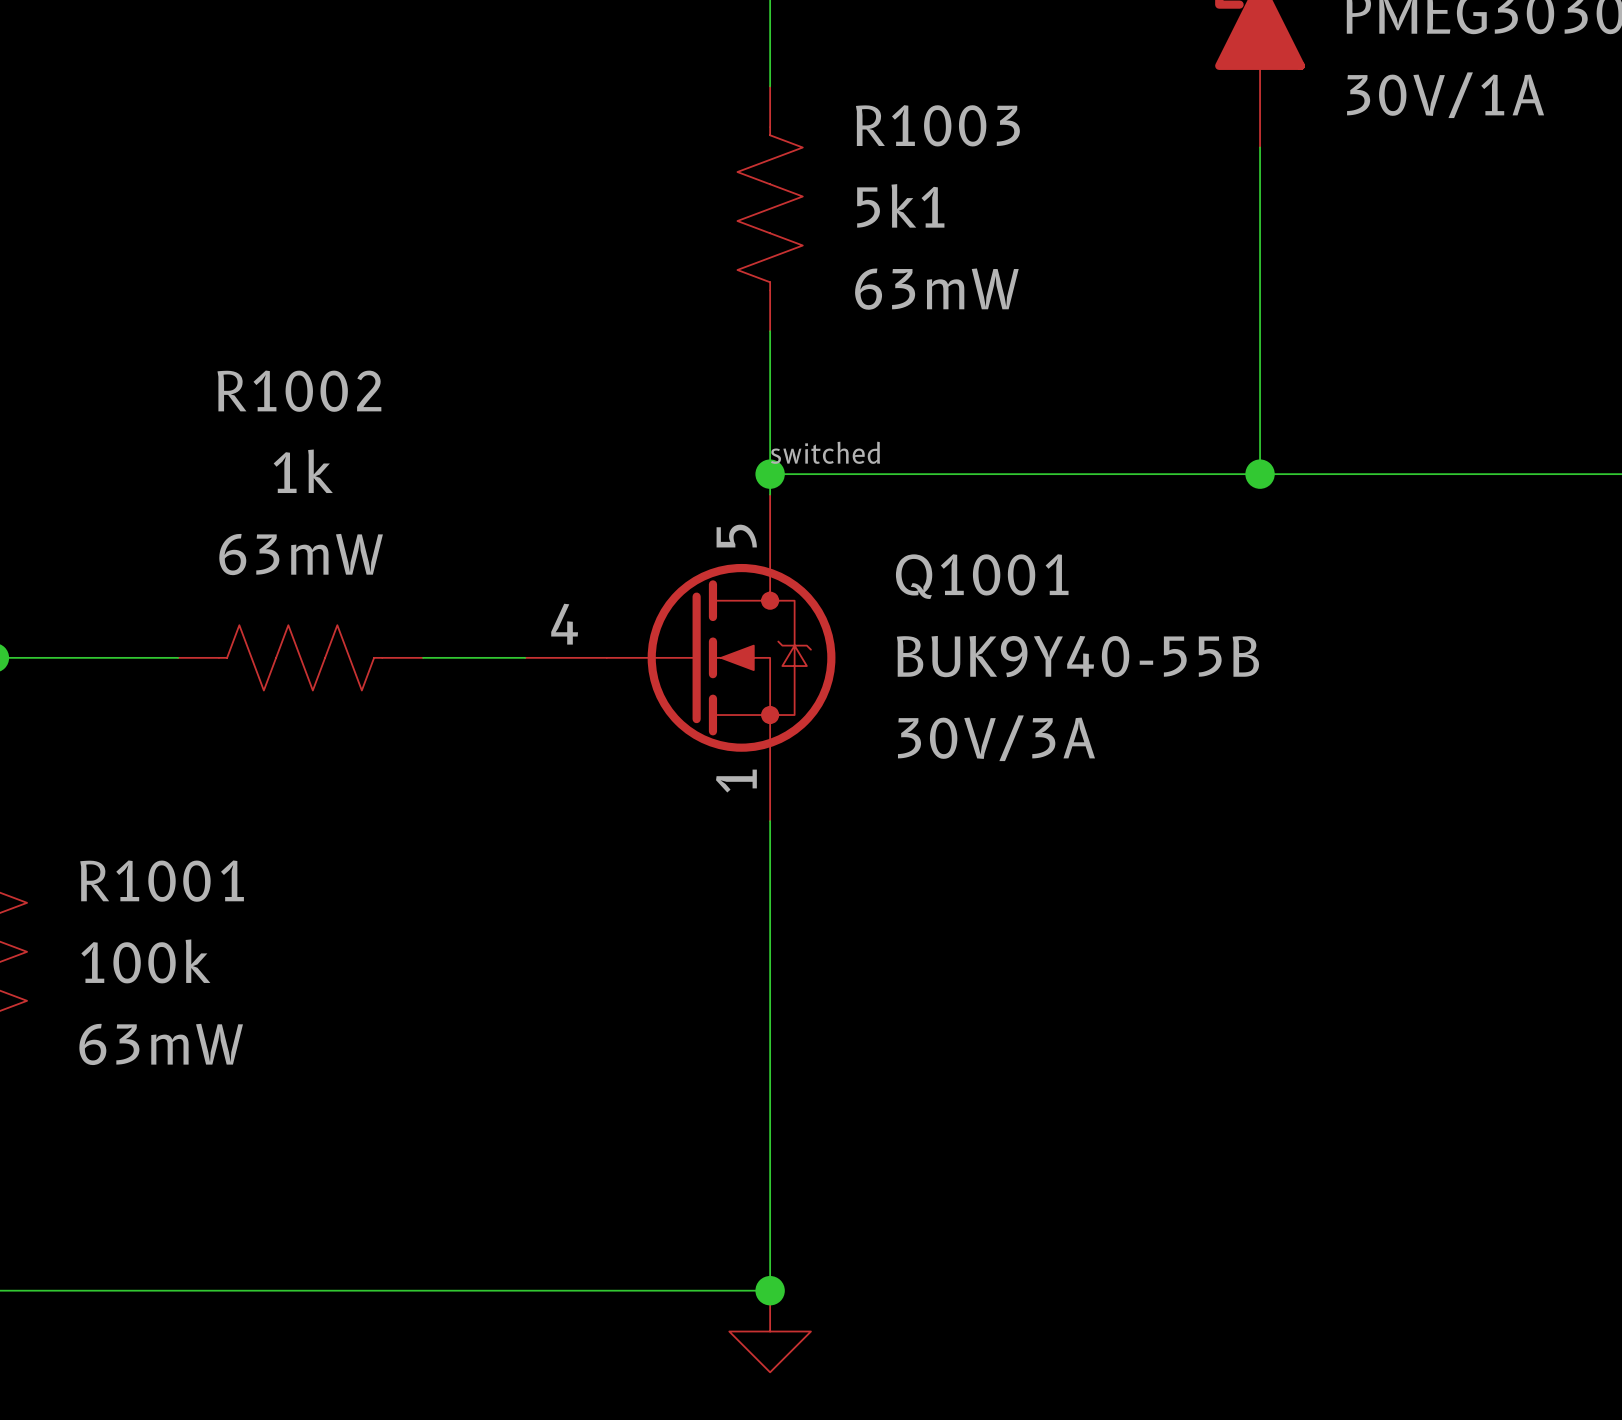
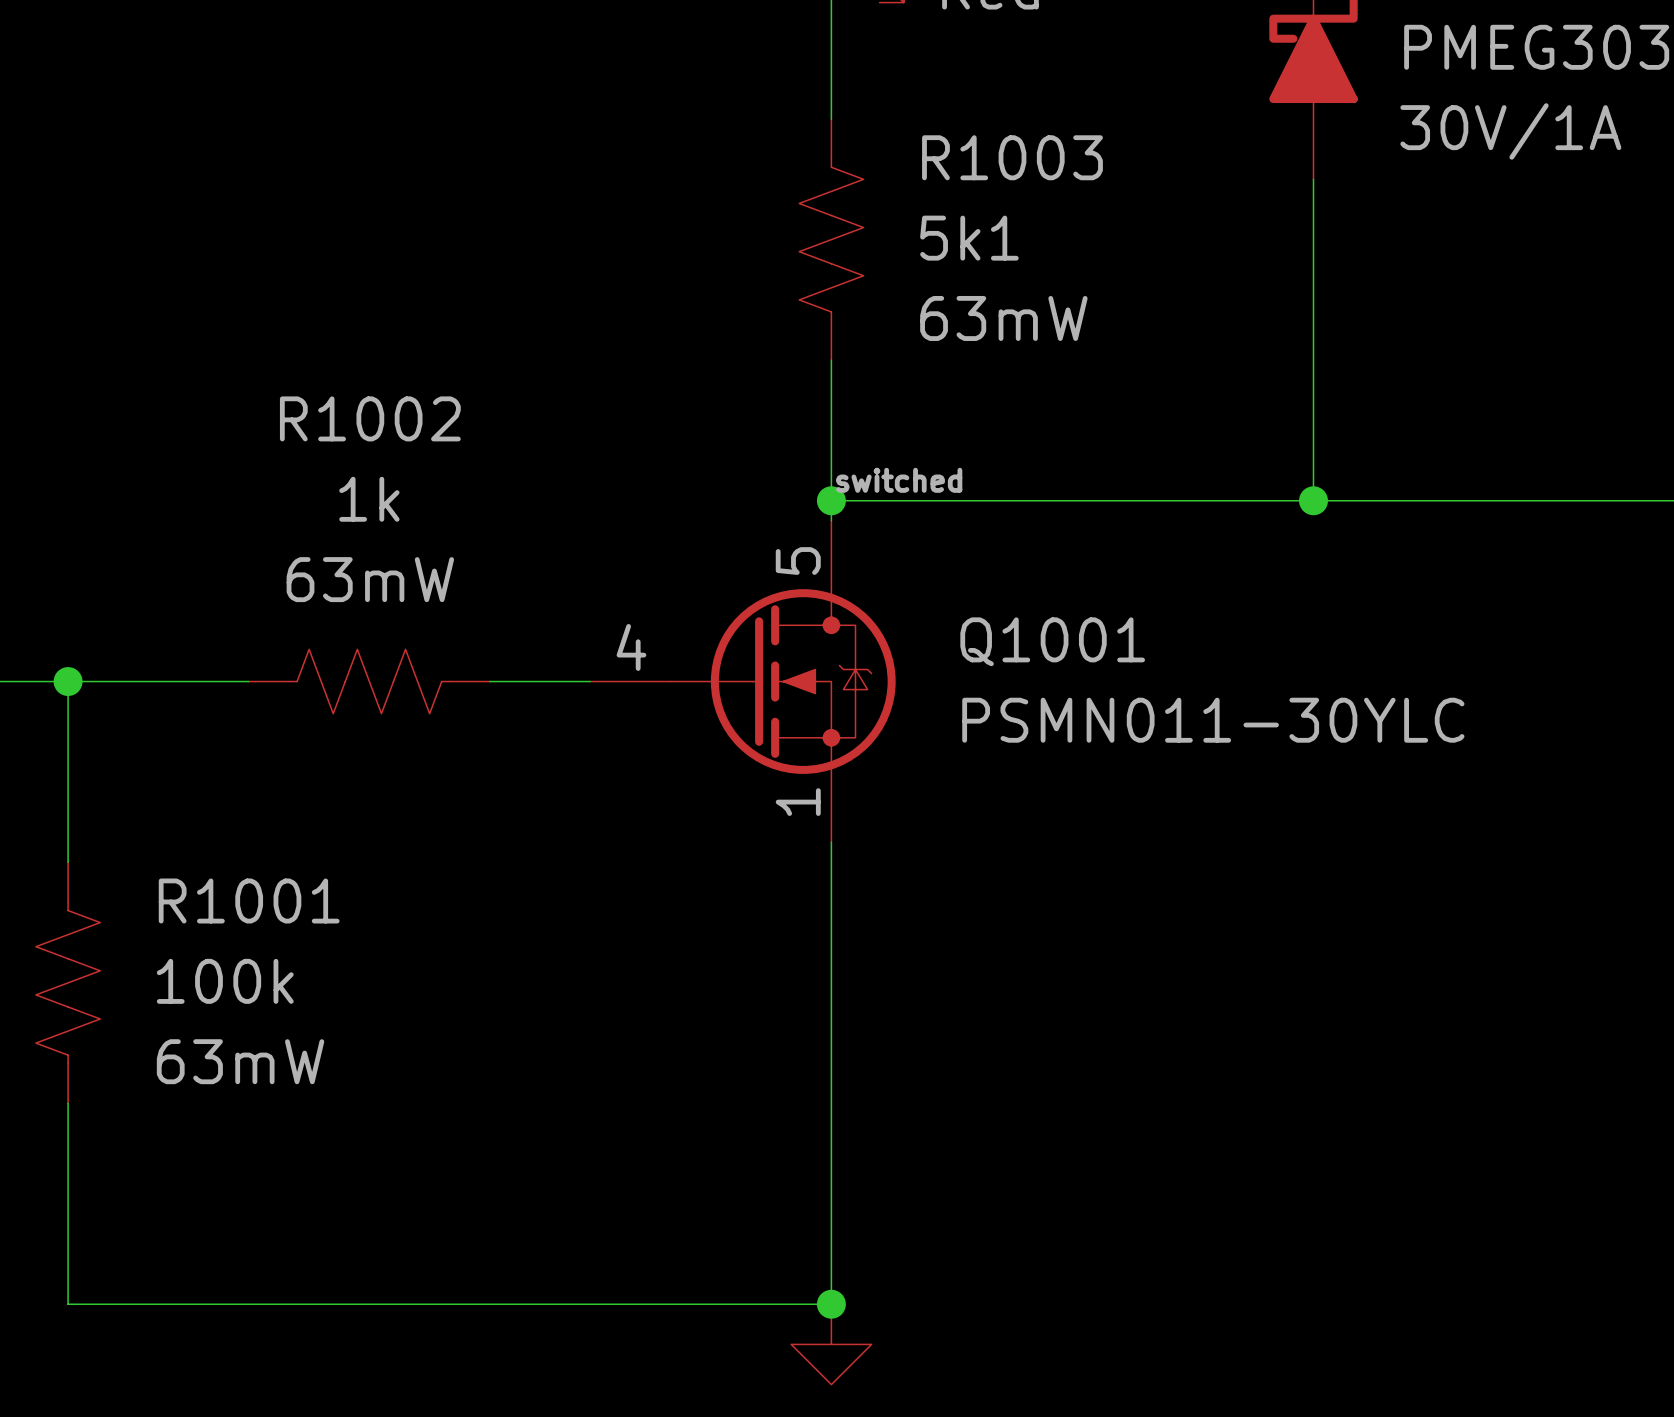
Q1001 name position: Q1001 (982, 576) -> Q1001 (1052, 641)
Q1001 value: BUK9Y40-55B (1077, 656) -> PSMN011-30YLC (1213, 720)
Q1001 text: 30V/3A (996, 738) -> none

